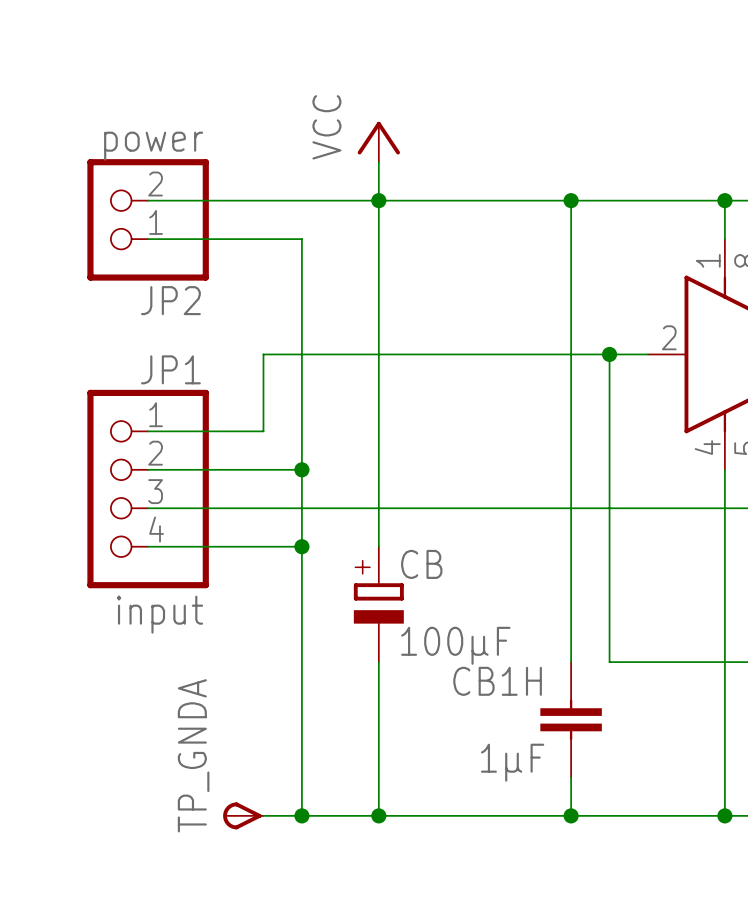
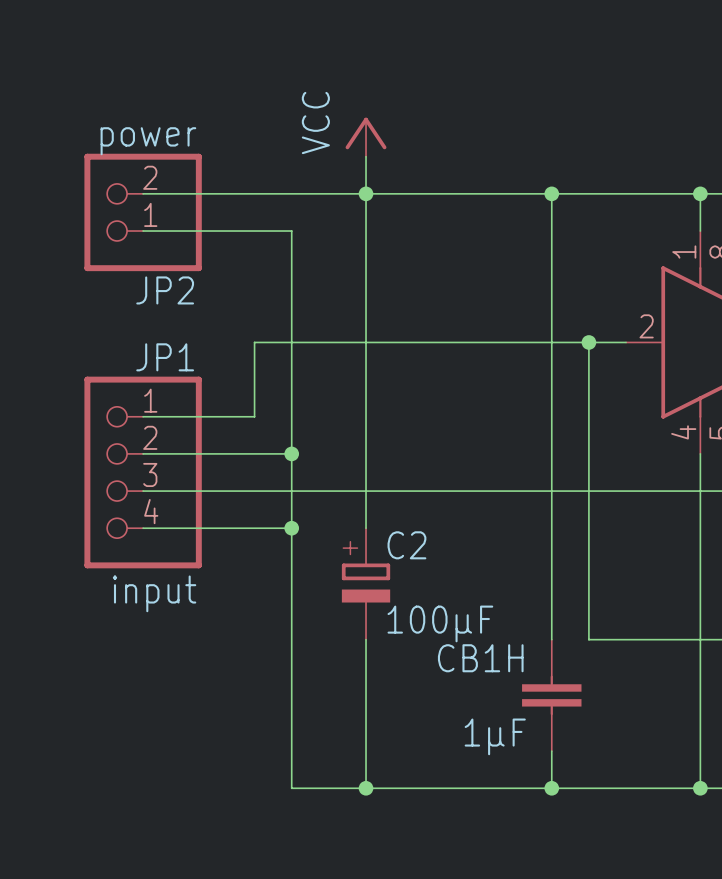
CB name: CB (421, 564) -> C2 (406, 545)
TP_GNDA: (243, 815) -> none
wire: (263, 815) (301, 815) -> none
junction: (301, 815) -> none

